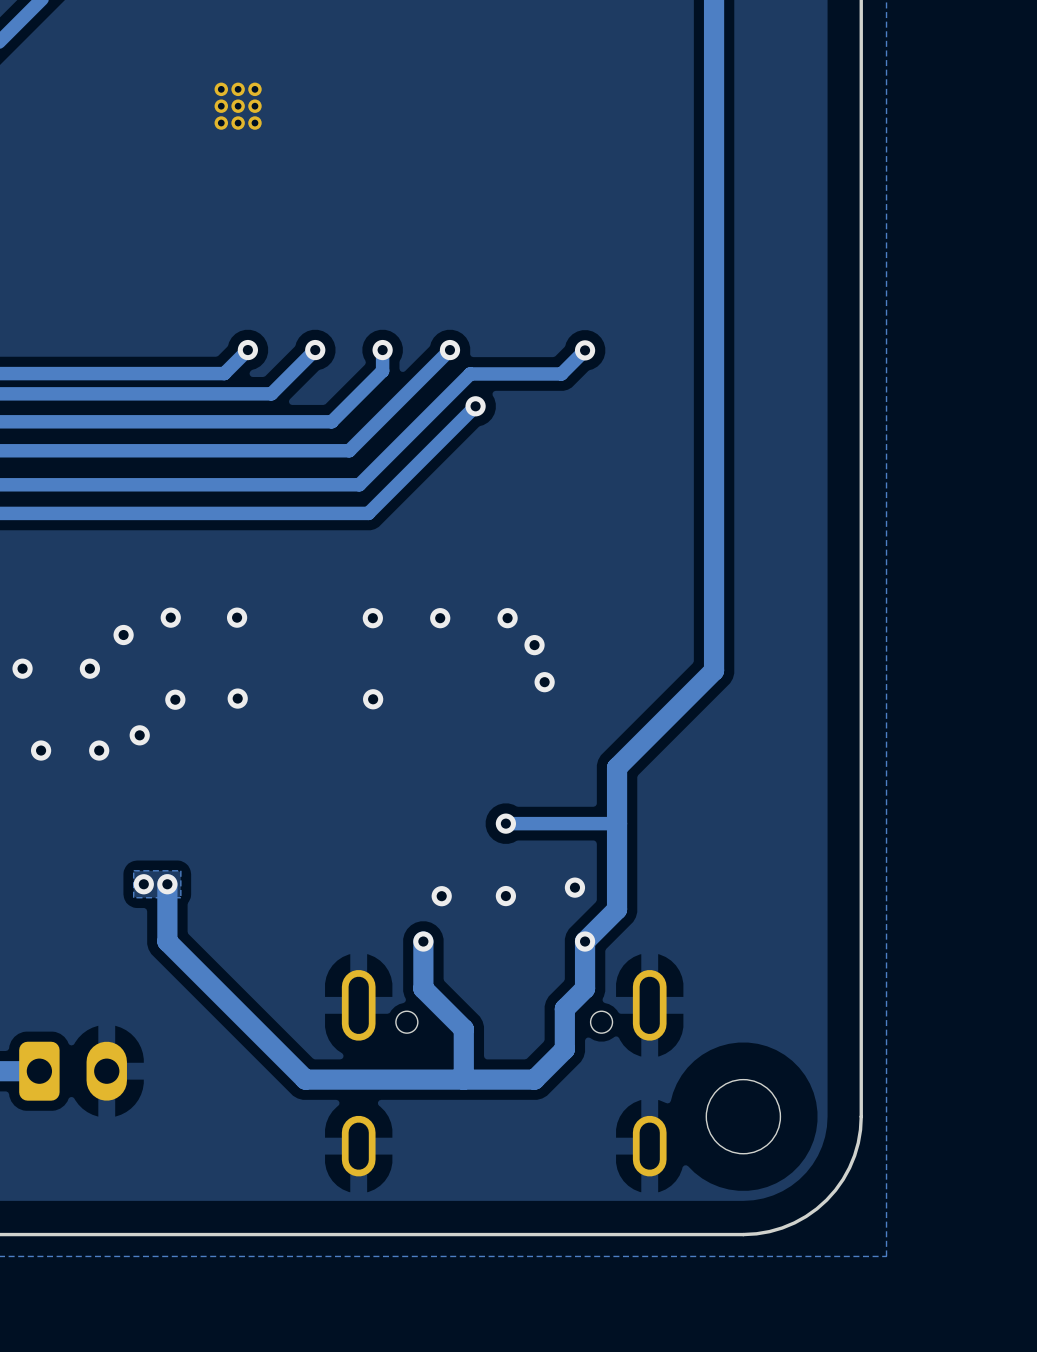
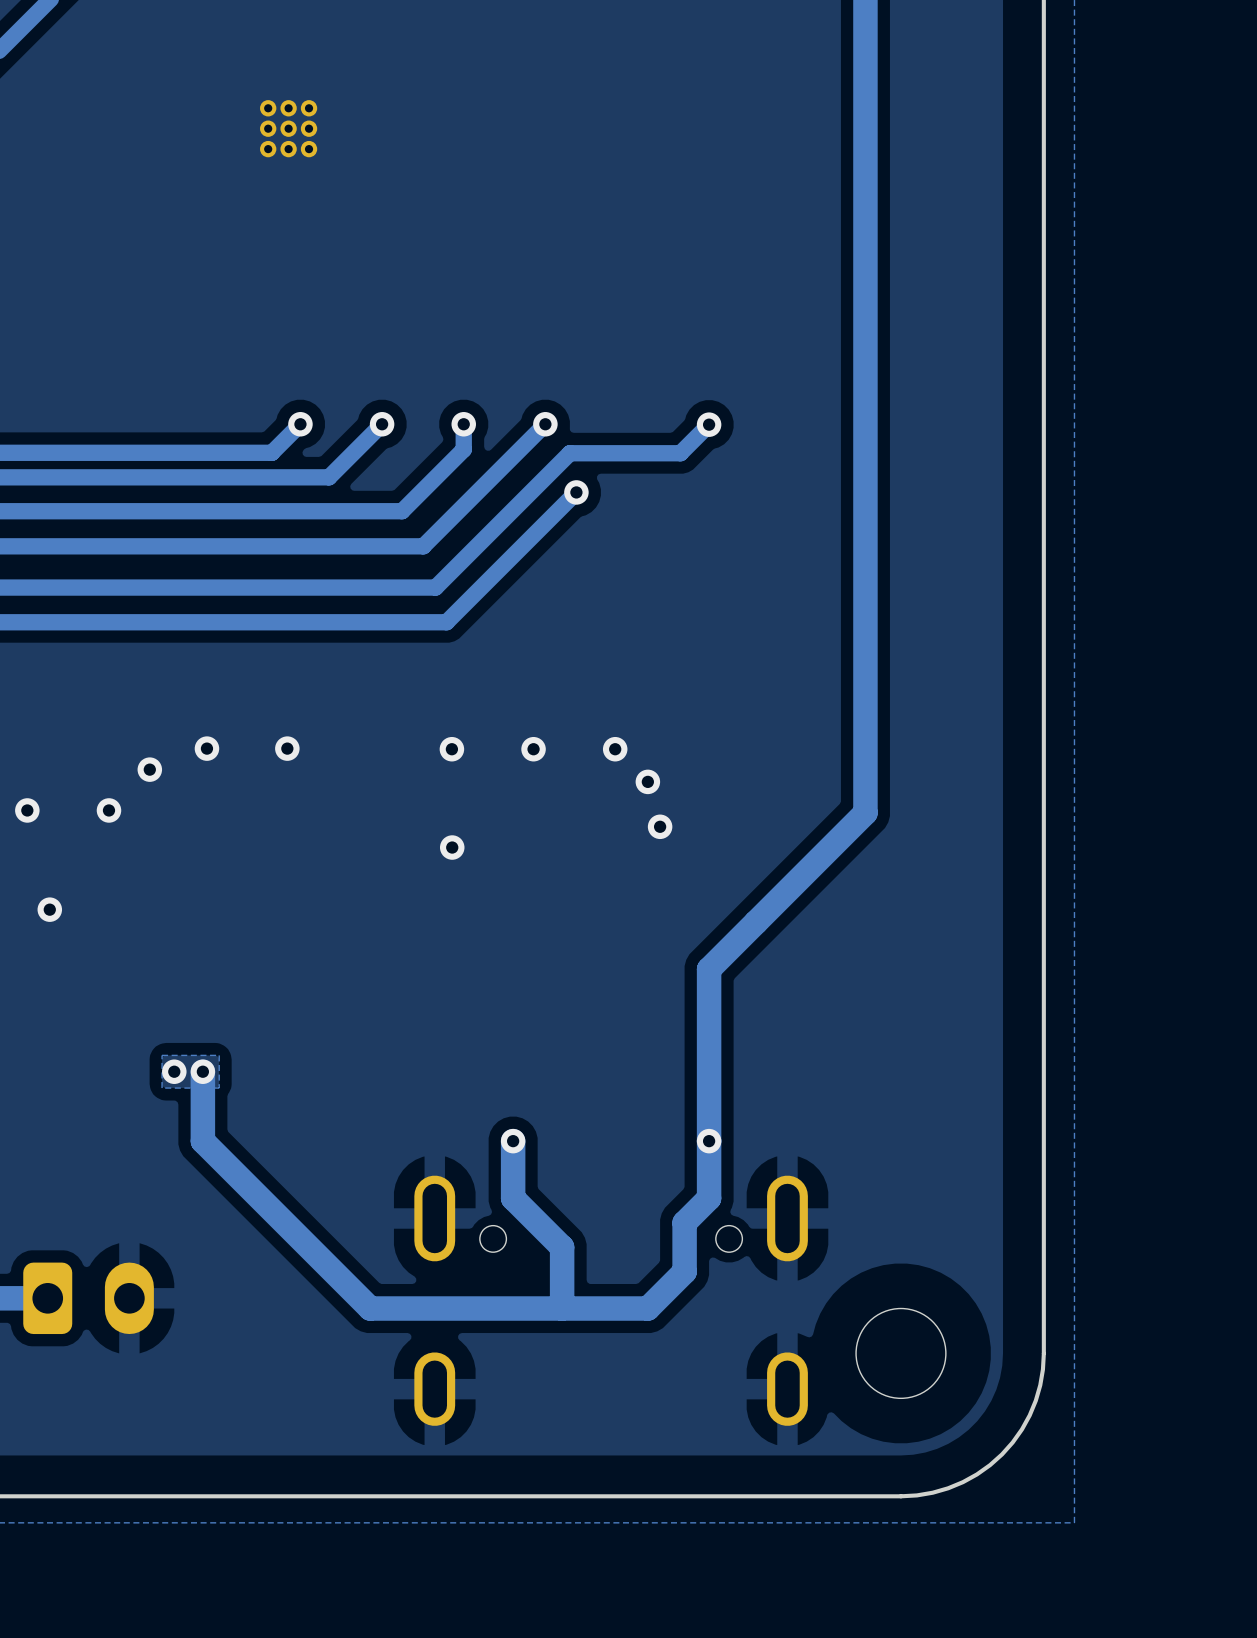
via: (237, 698) -> none
via: (175, 699) -> none
via: (139, 735) -> none
via: (99, 750) -> none
track: (617, 767) (617, 909) (585, 941) -> (747, 930) (709, 969) (709, 1141)
via: (505, 823) -> none
track: (617, 823) (505, 823) -> none
via: (574, 887) -> none
via: (441, 896) -> none
via: (505, 896) -> none

